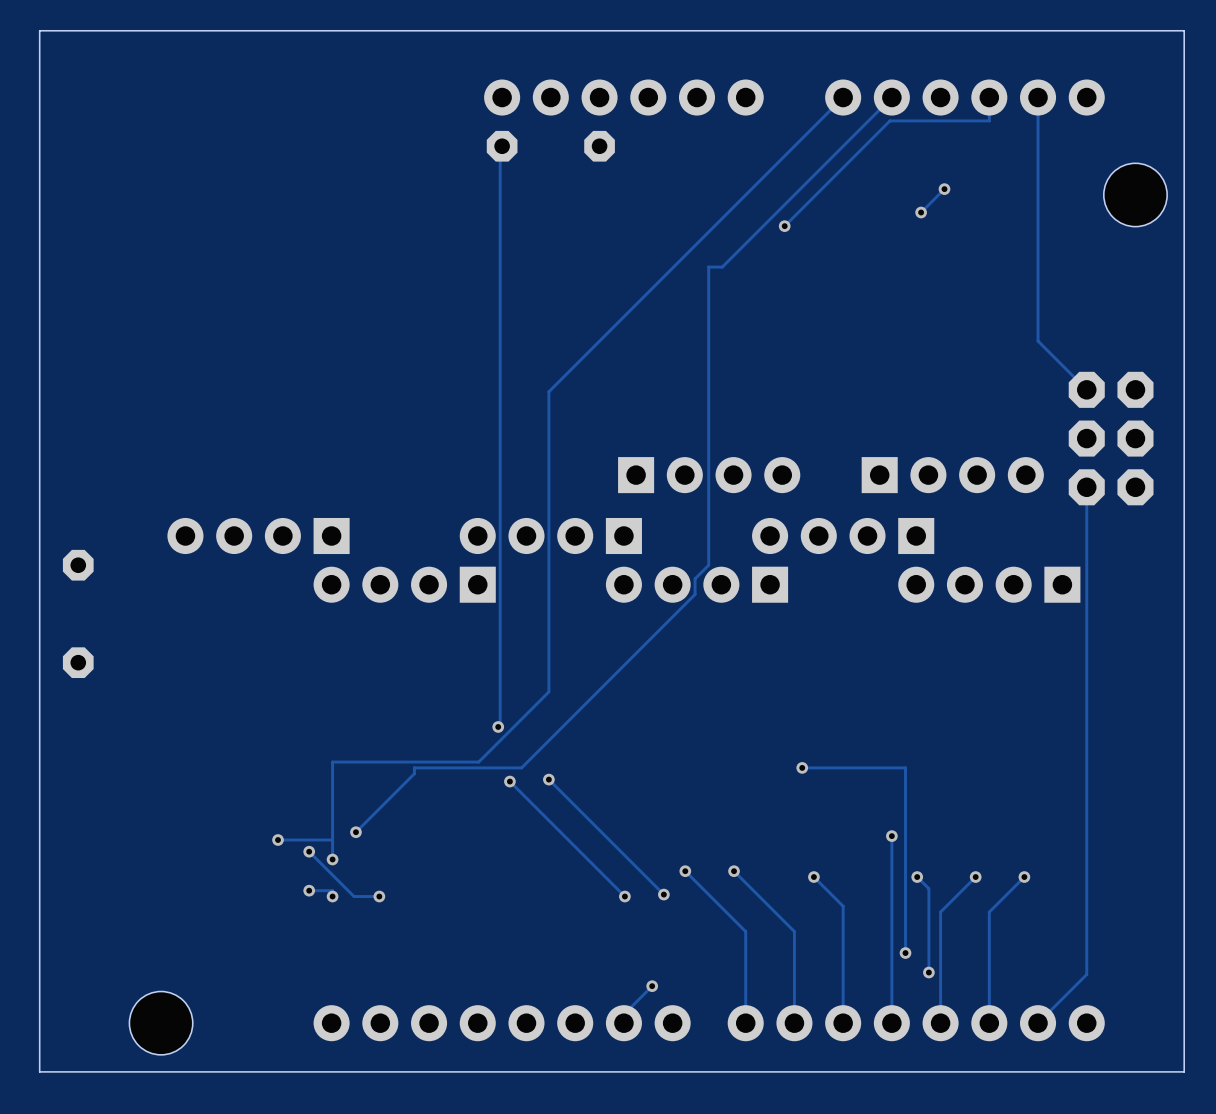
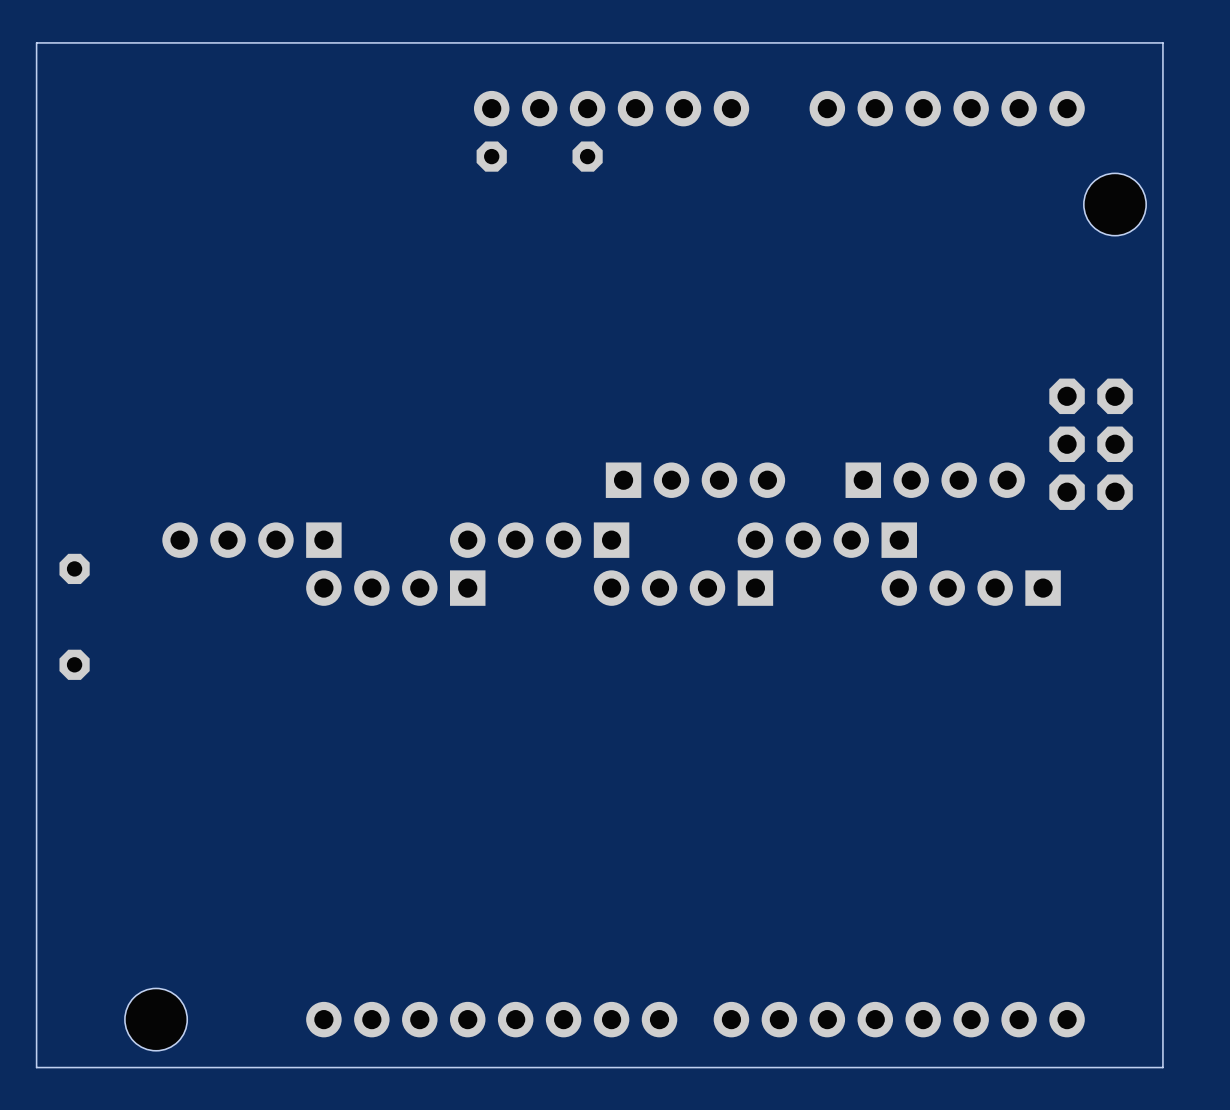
track: (843, 97) (548, 391) (548, 691) (478, 762) (332, 762) (332, 859) -> none
track: (891, 97) (722, 267) (708, 267) (708, 565) (695, 578) (695, 594) (521, 767) (414, 767) (414, 773) (355, 832) -> none
track: (989, 97) (989, 120) (889, 120) (784, 226) -> none
track: (1038, 97) (1038, 341) (1086, 389) -> none
track: (502, 146) (500, 148) (500, 725) (498, 726) -> none
track: (944, 189) (921, 212) -> none
via: (944, 189) -> none
via: (921, 212) -> none
via: (784, 226) -> none
track: (1086, 487) (1086, 974) (1038, 1023) -> none
via: (498, 726) -> none
track: (802, 767) (905, 767) (905, 953) -> none
via: (802, 767) -> none
track: (548, 779) (663, 894) -> none
via: (548, 779) -> none
track: (509, 781) (624, 896) -> none
via: (509, 781) -> none
via: (355, 832) -> none
track: (891, 836) (891, 1023) -> none
via: (891, 836) -> none
via: (278, 840) -> none
track: (332, 840) (278, 840) -> none
track: (309, 851) (354, 896) (379, 896) -> none
via: (309, 851) -> none
via: (332, 859) -> none
track: (685, 871) (745, 931) (745, 1023) -> none
via: (685, 871) -> none
track: (734, 871) (794, 931) (794, 1023) -> none
via: (734, 871) -> none
track: (813, 877) (843, 906) (843, 1023) -> none
via: (813, 877) -> none
track: (917, 877) (928, 888) (928, 972) -> none
via: (917, 877) -> none
track: (975, 877) (940, 912) (940, 1023) -> none
via: (975, 877) -> none
track: (1024, 877) (989, 912) (989, 1023) -> none
via: (1024, 877) -> none
track: (309, 890) (332, 890) (332, 896) -> none
via: (309, 890) -> none
via: (663, 894) -> none
via: (332, 896) -> none
via: (379, 896) -> none
via: (624, 896) -> none
via: (905, 953) -> none
via: (928, 972) -> none
track: (652, 986) (624, 1013) (623, 1023) -> none
via: (652, 986) -> none

